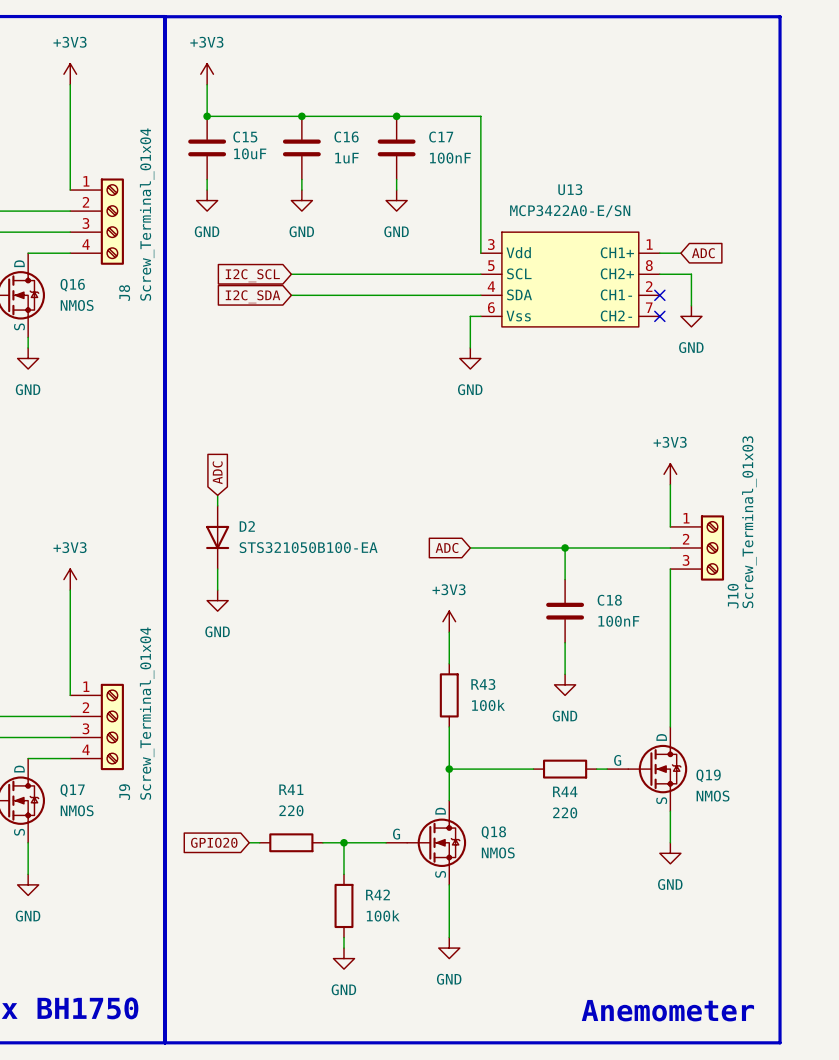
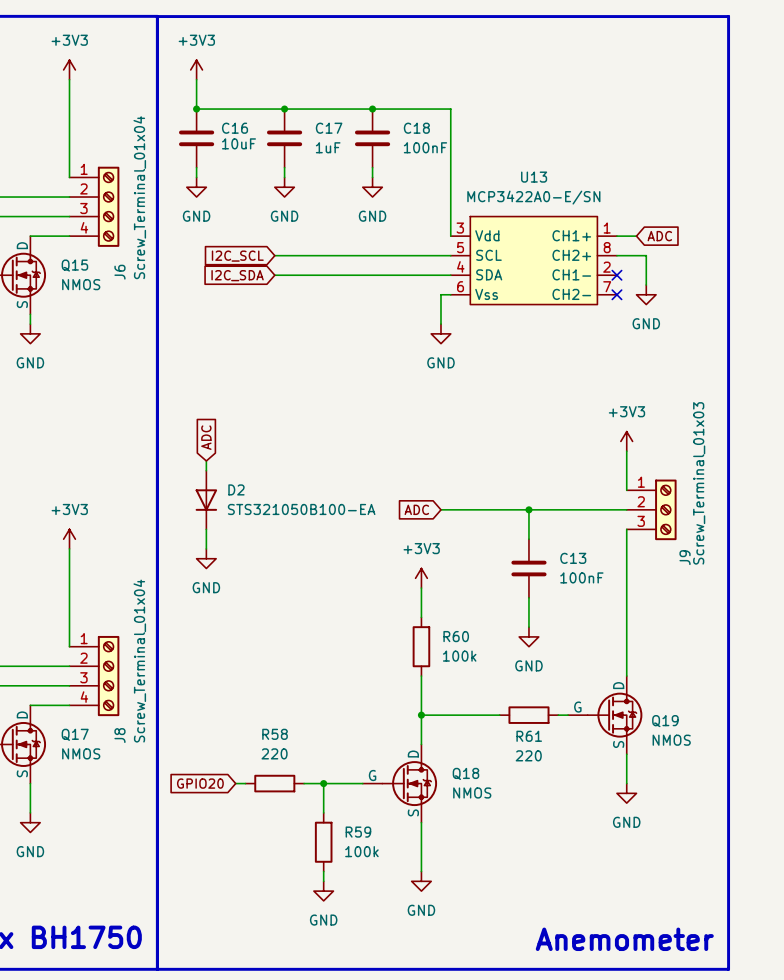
C15 name: C15 (245, 137) -> C16 (235, 128)
C16 name: C16 (346, 137) -> C17 (329, 128)
C17 name: C17 (441, 137) -> C18 (416, 128)
Q16 name: Q16 (72, 285) -> Q15 (74, 265)
J8 name: J8 (124, 293) -> J6 (119, 272)
J10 name: J10 (733, 596) -> J9 (685, 557)
C18 name: C18 (609, 600) -> C13 (573, 558)
R43 name: R43 (483, 684) -> R60 (456, 636)
R41 name: R41 (291, 789) -> R58 (275, 734)
R44 name: R44 (565, 791) -> R61 (529, 736)
J9 name: J9 (124, 792) -> J8 (119, 735)
R42 name: R42 (377, 894) -> R59 (358, 832)

